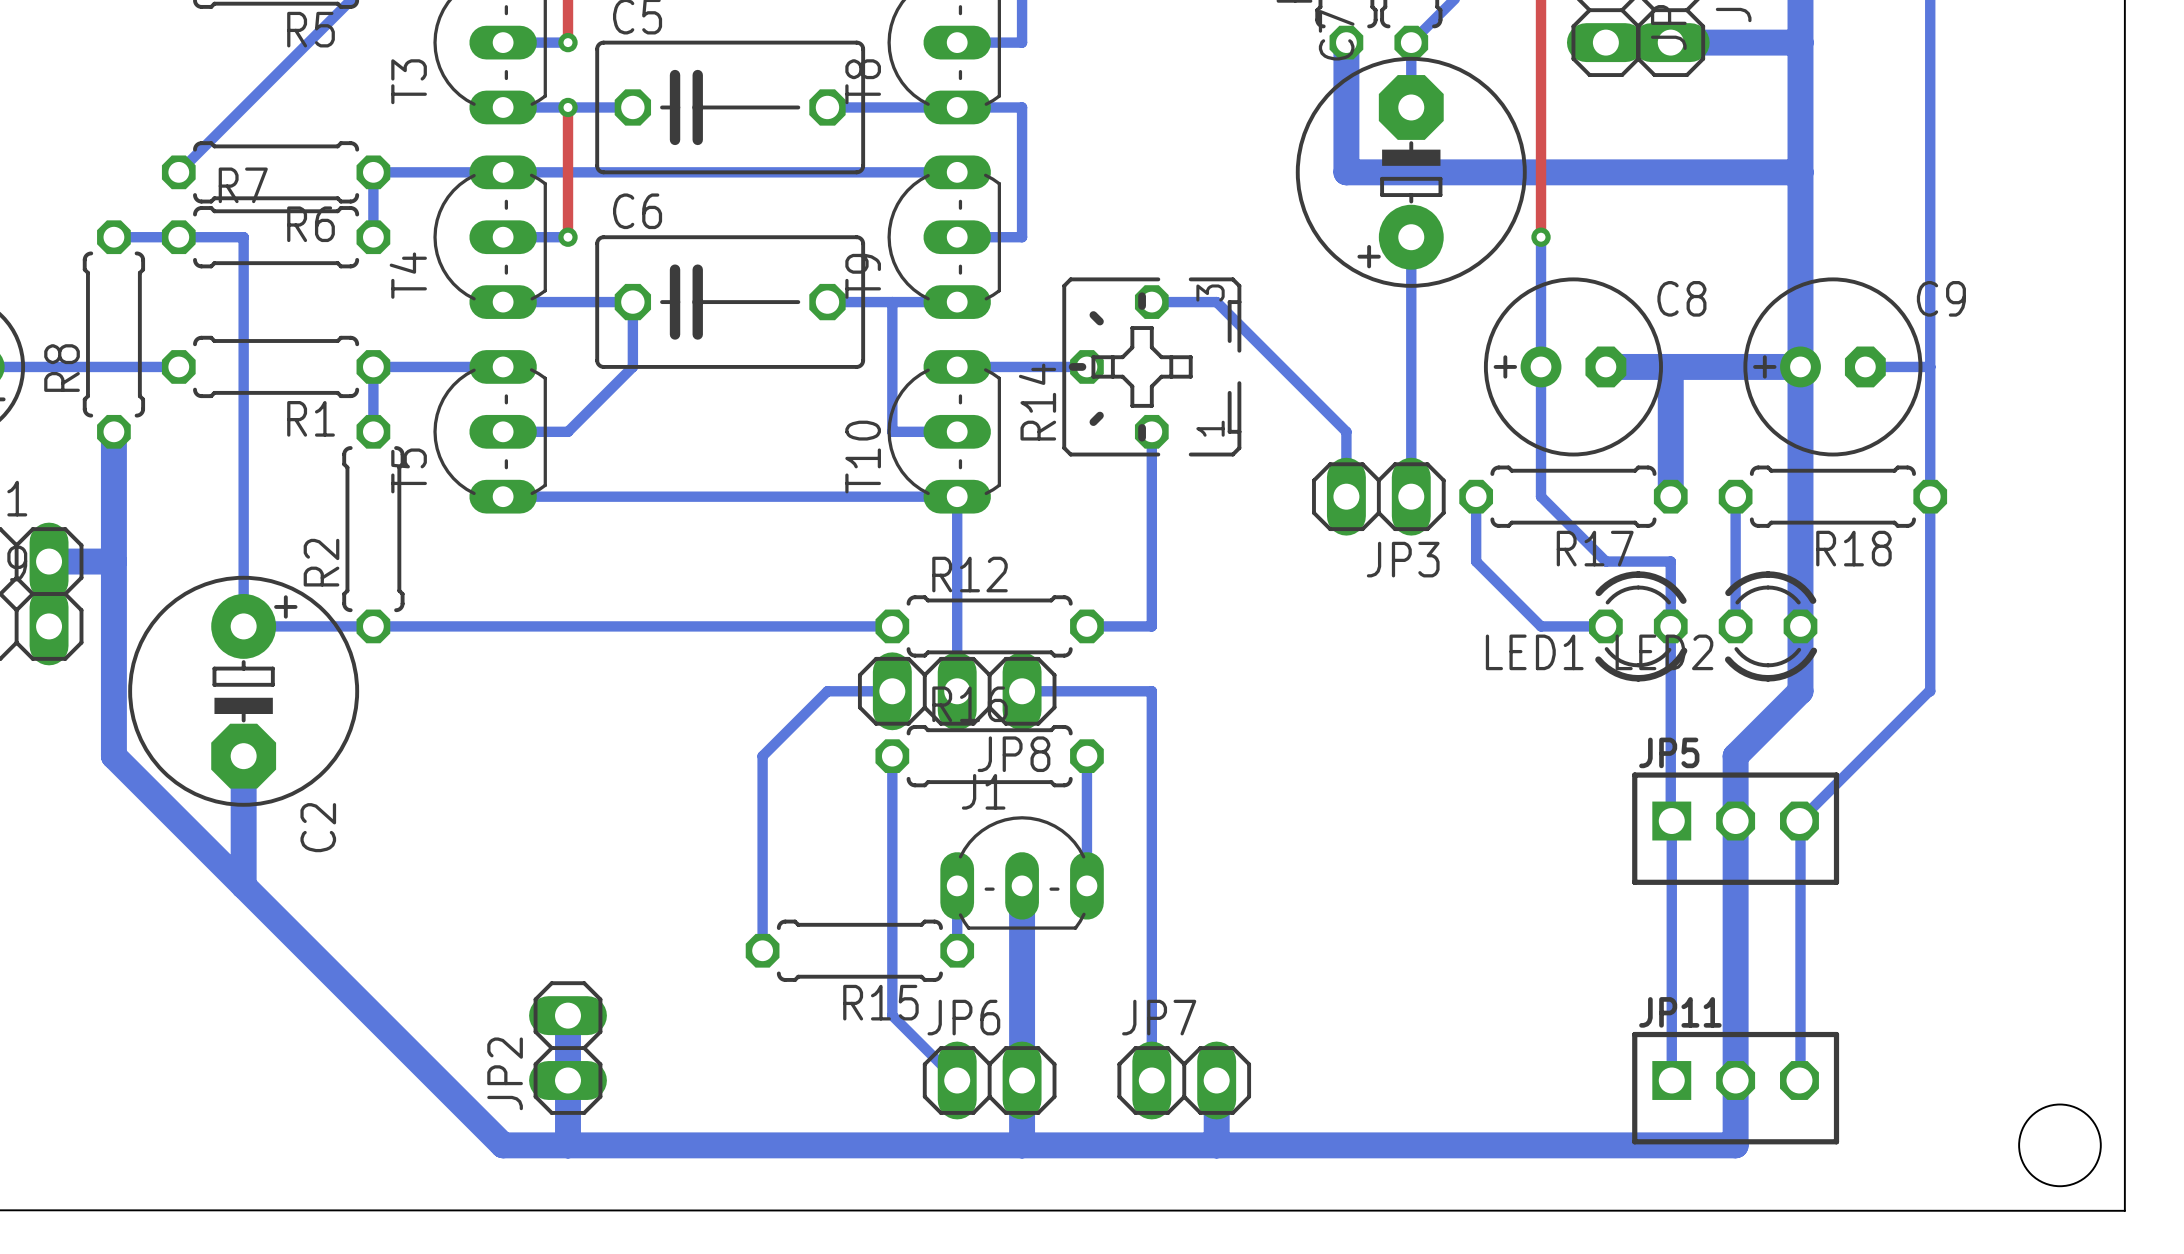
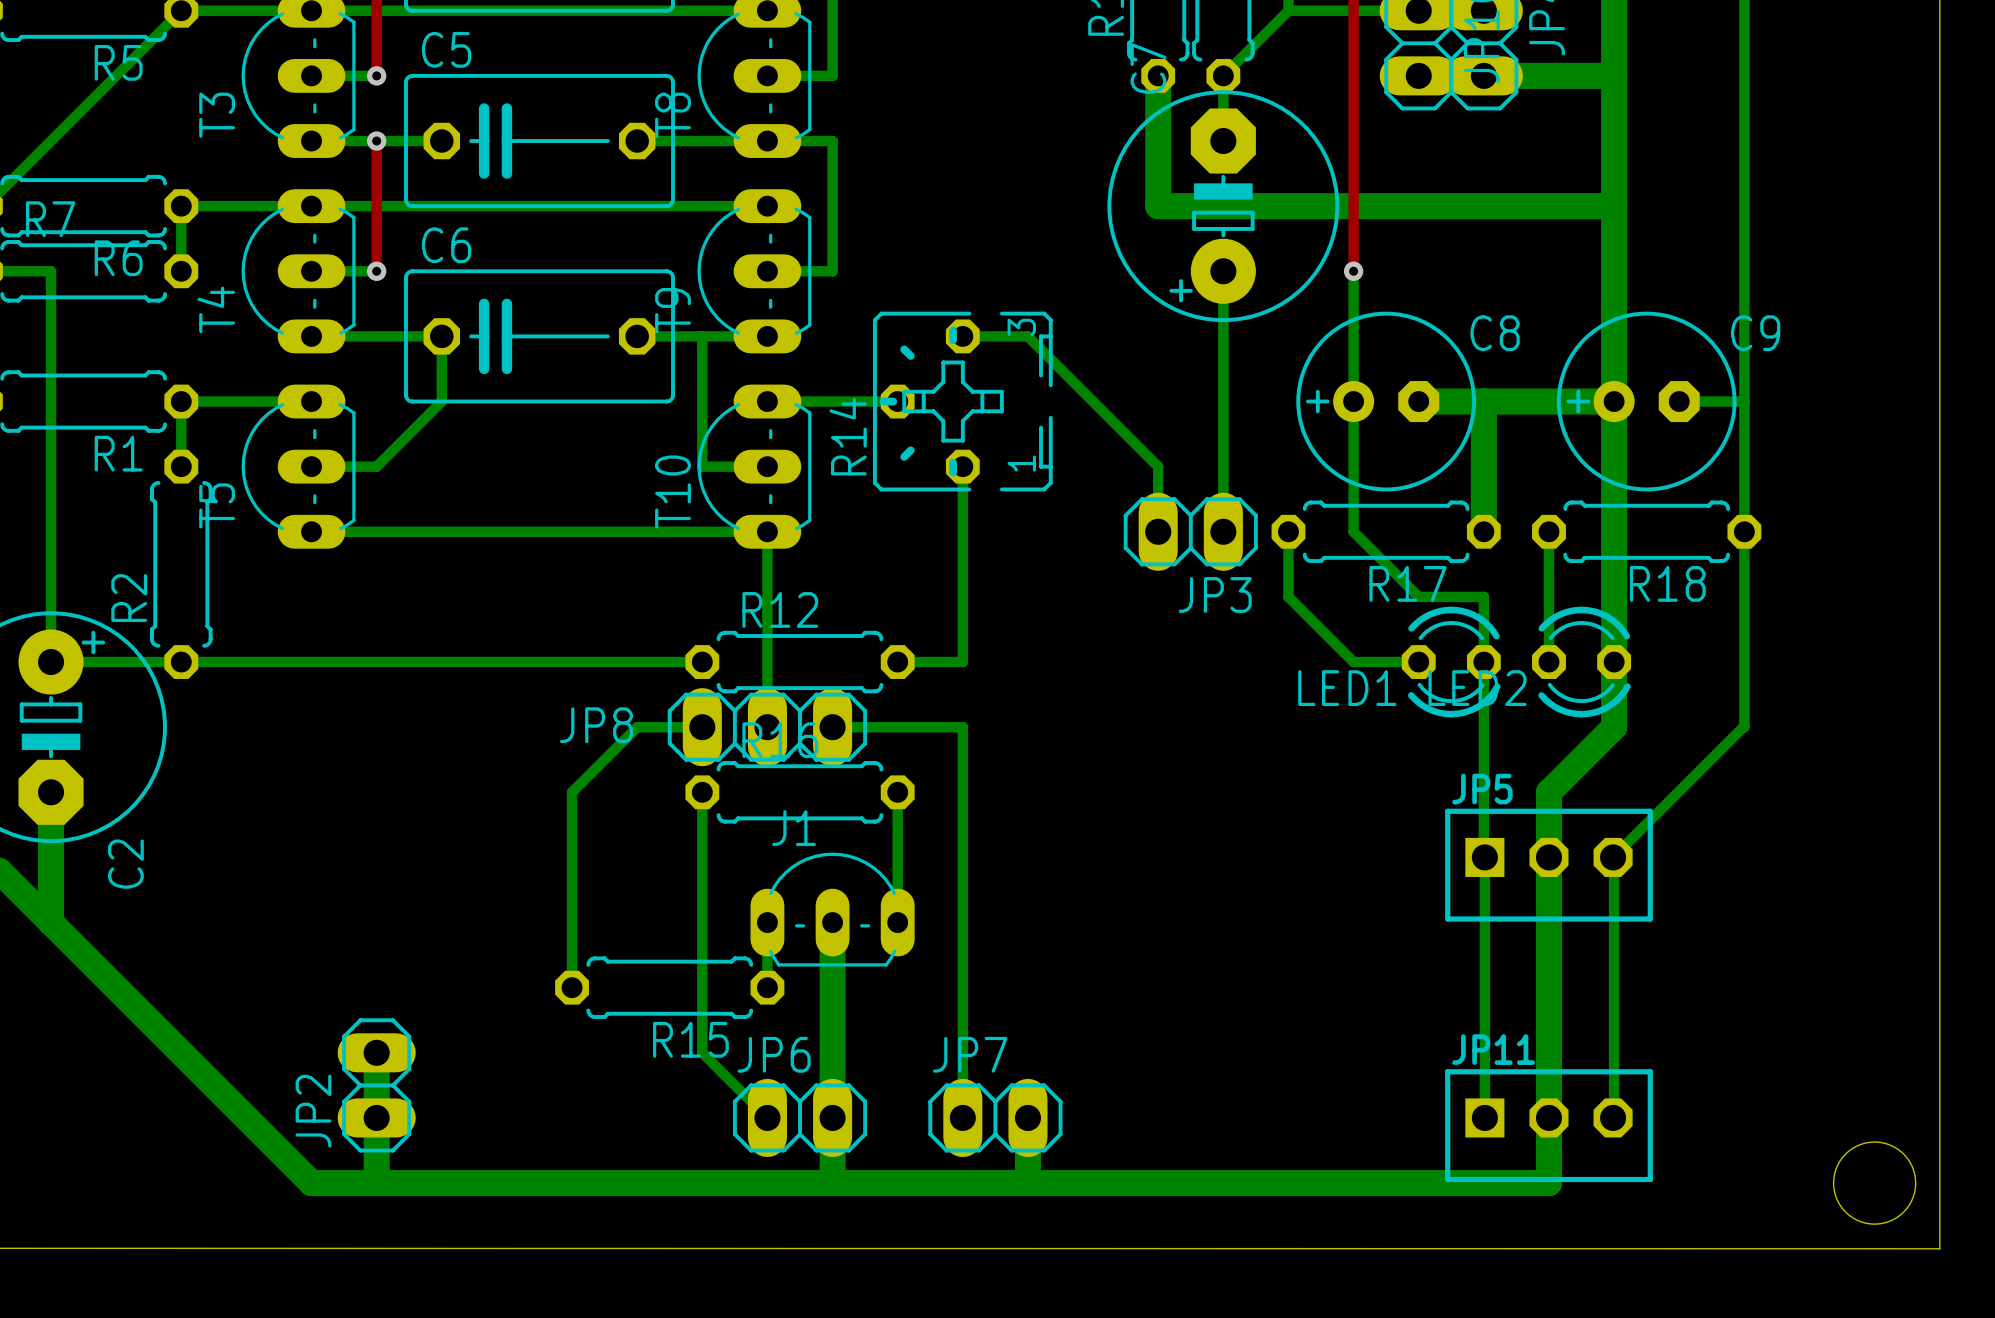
JP8 name position: JP8 (1014, 754) -> JP8 (596, 725)

